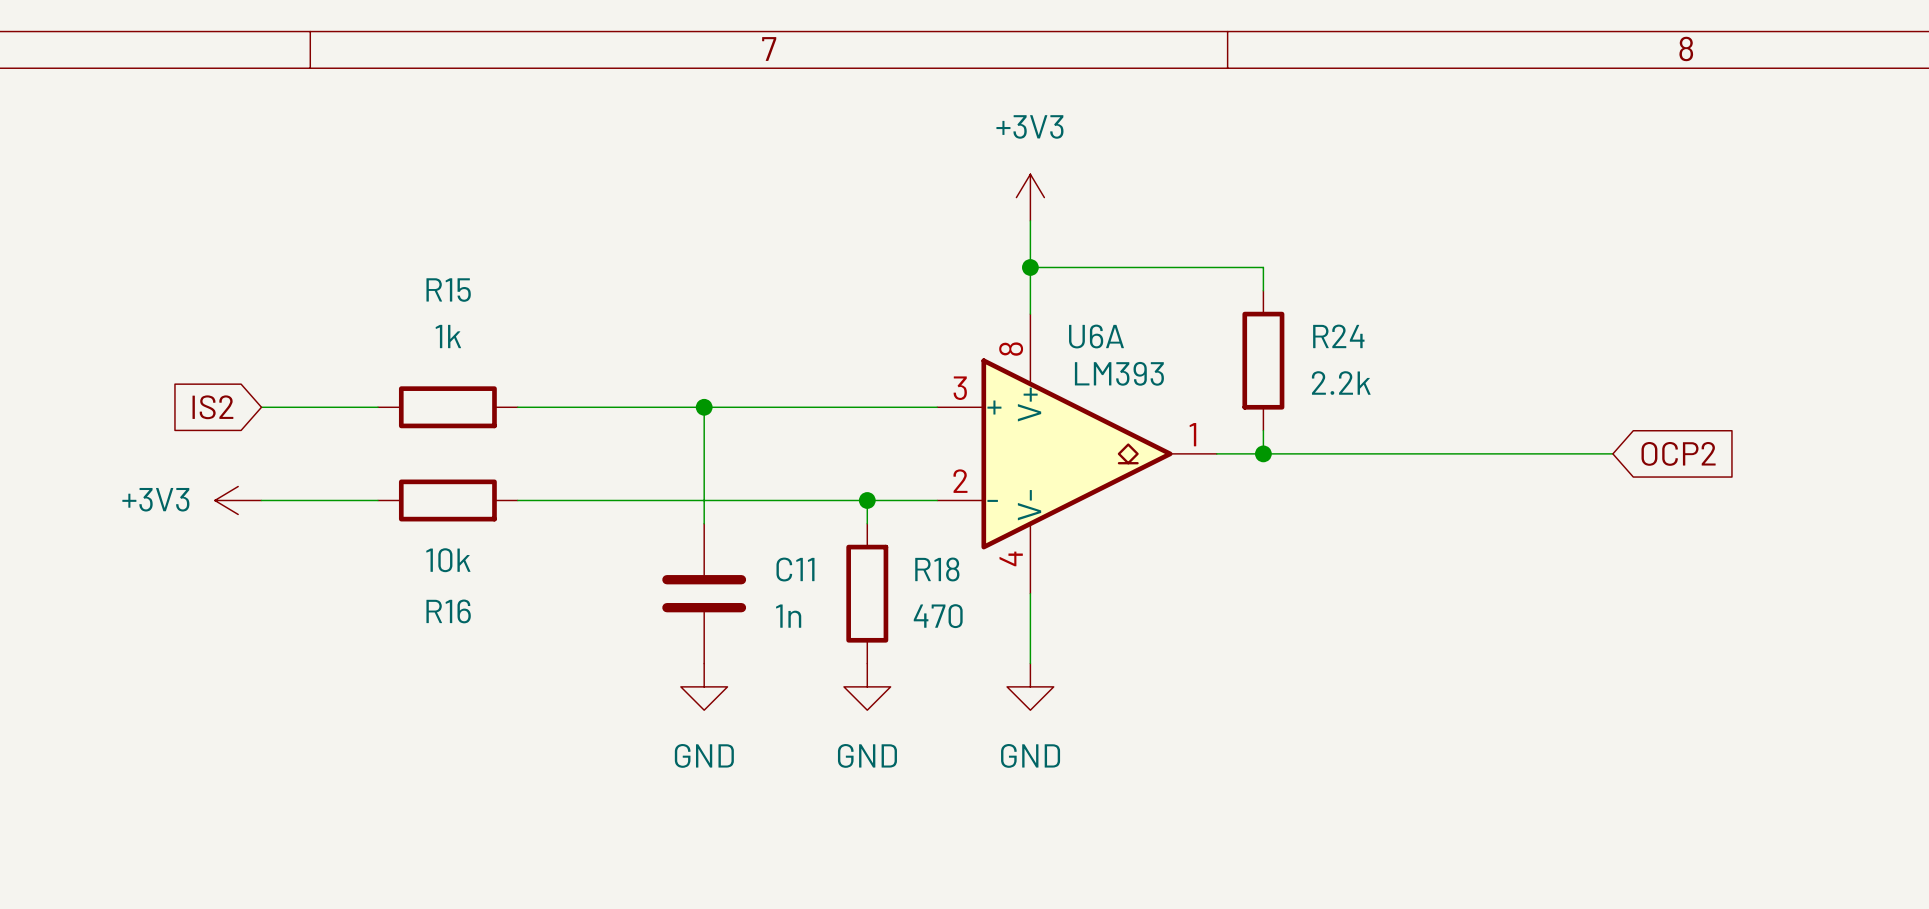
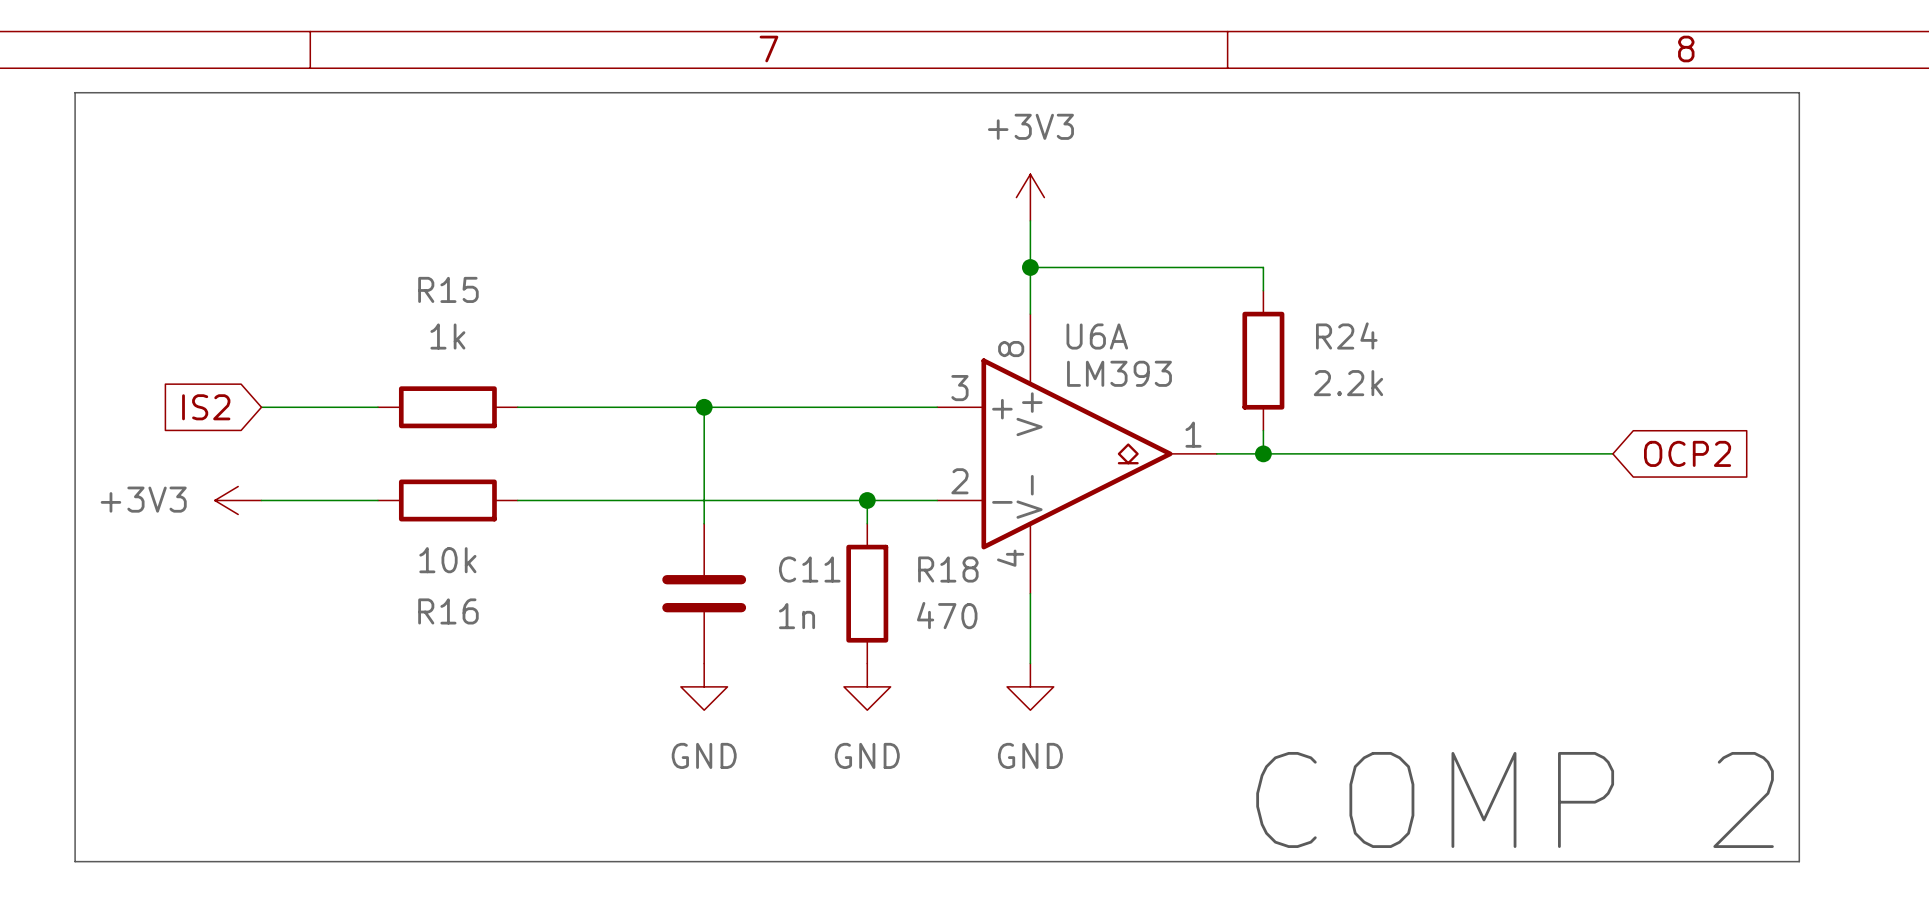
line: none -> (75, 92) (1799, 92) (1799, 861) (75, 861) (75, 92)
text: none -> COMP 2 (1515, 799)

